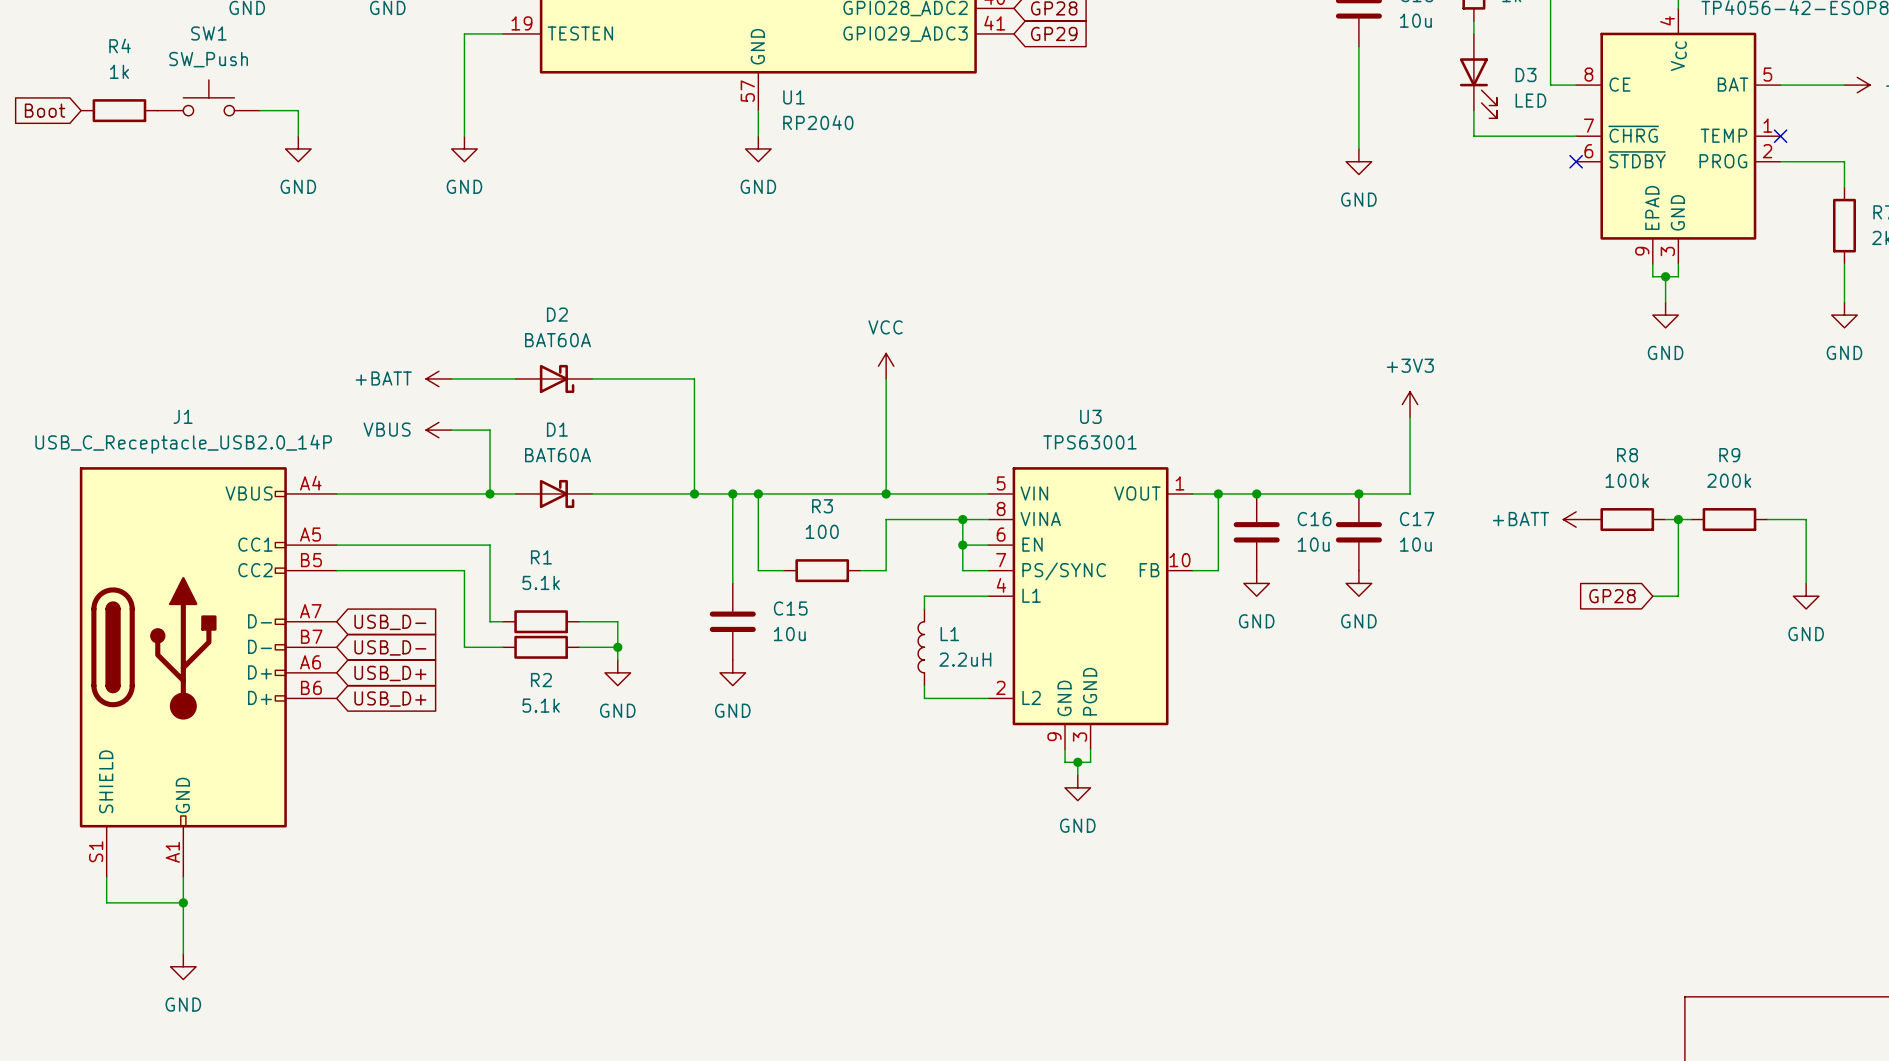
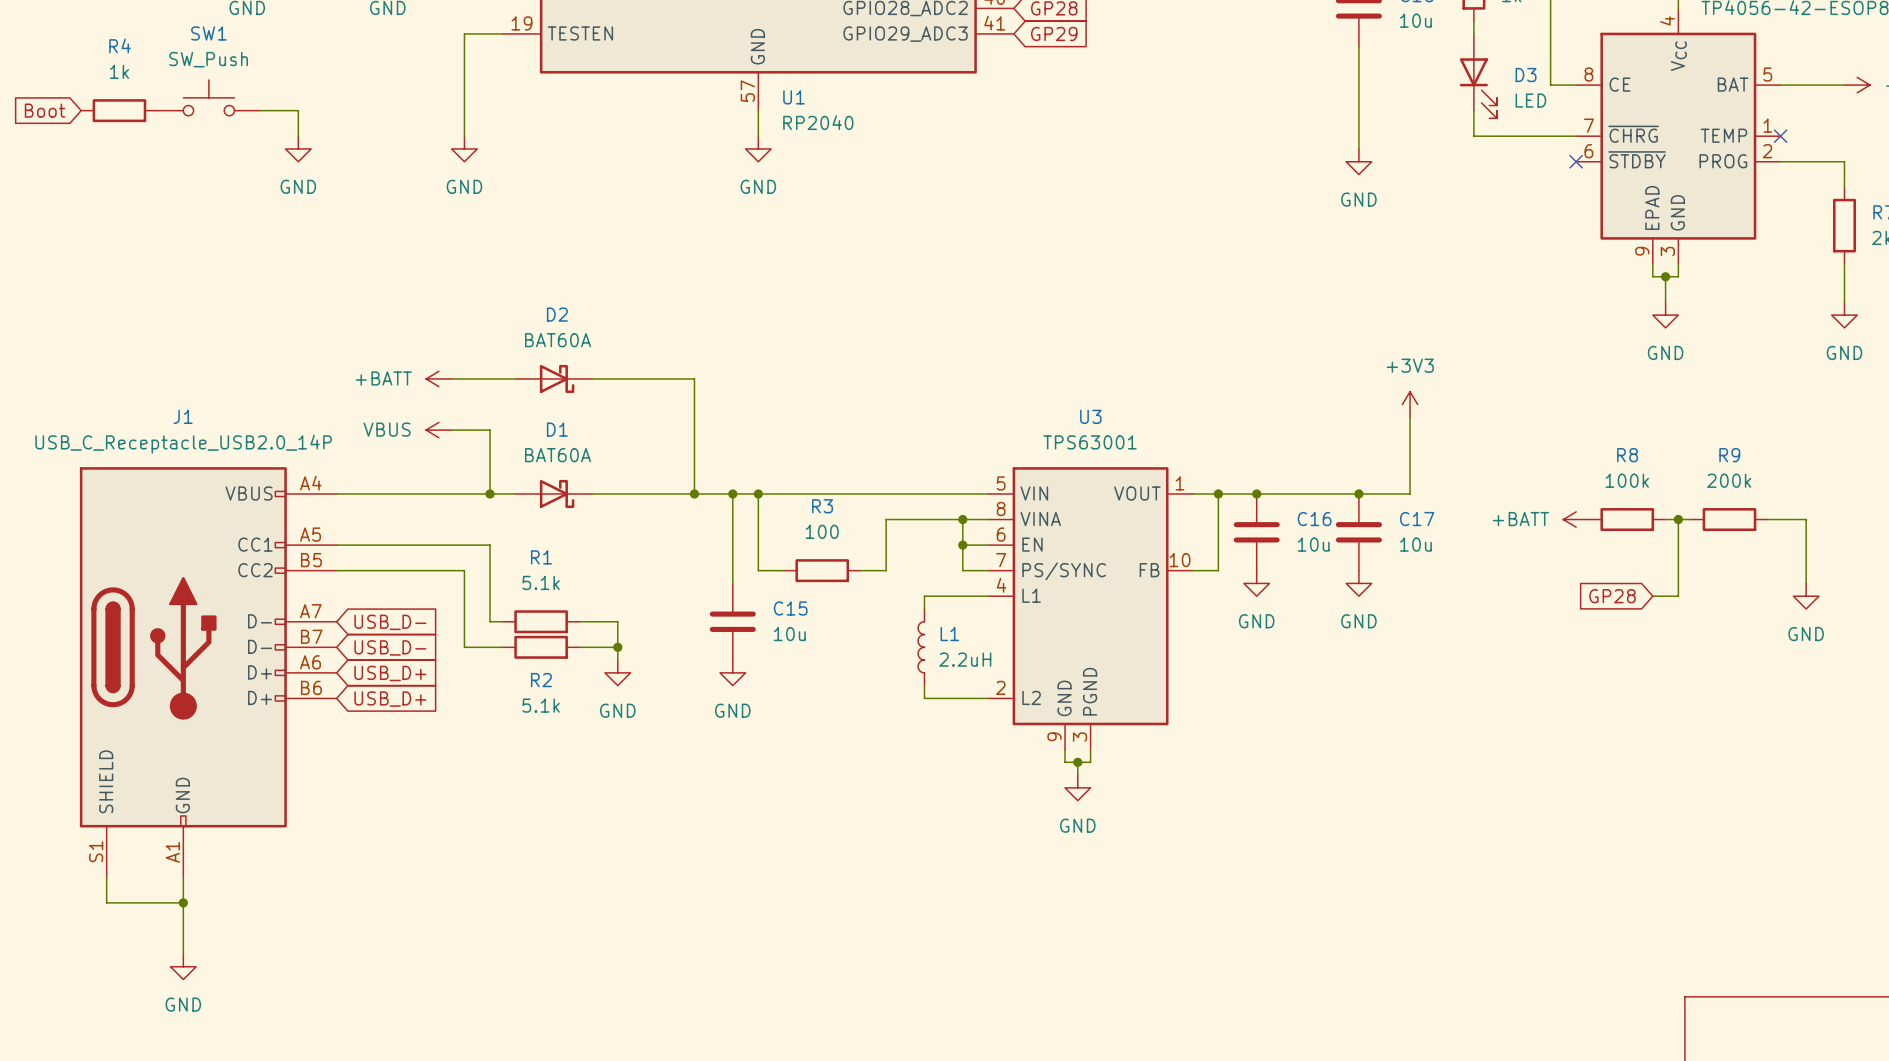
power symbol: VCC (886, 366) -> none
wire: (886, 378) (886, 493) -> none
junction: (886, 493) -> none

